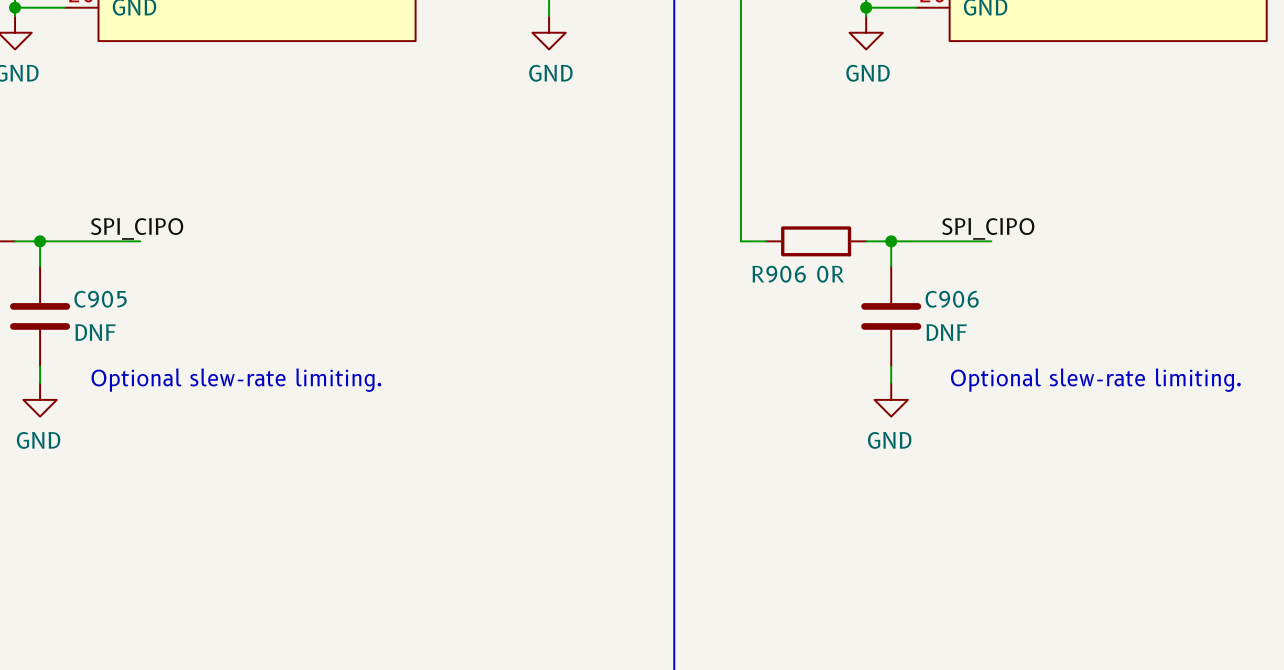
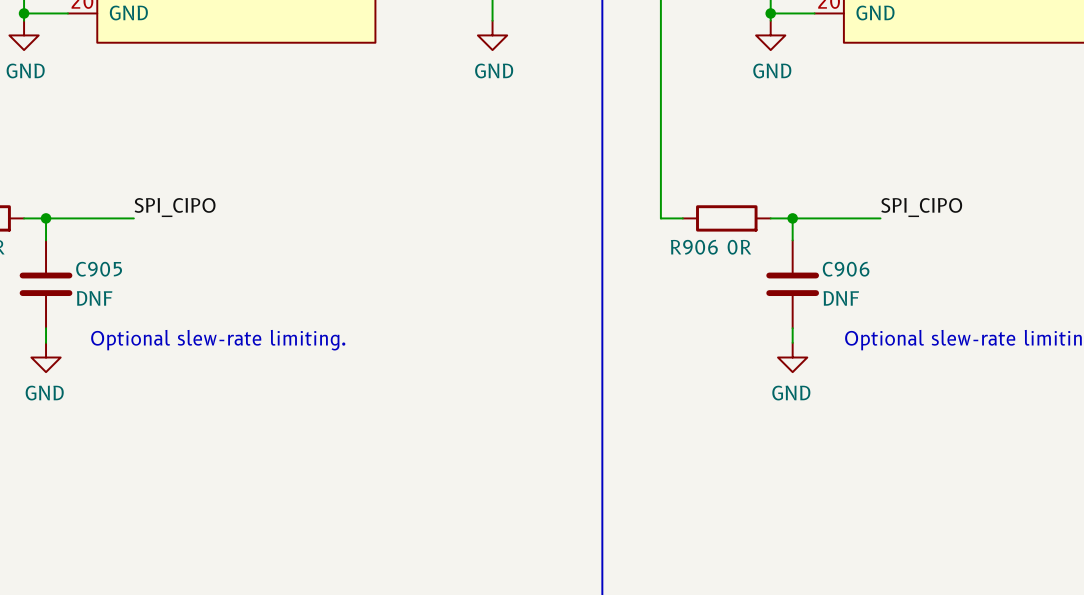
label position: SPI_CIPO (137, 228) -> SPI_CIPO (175, 207)
label position: SPI_CIPO (988, 228) -> SPI_CIPO (921, 207)

